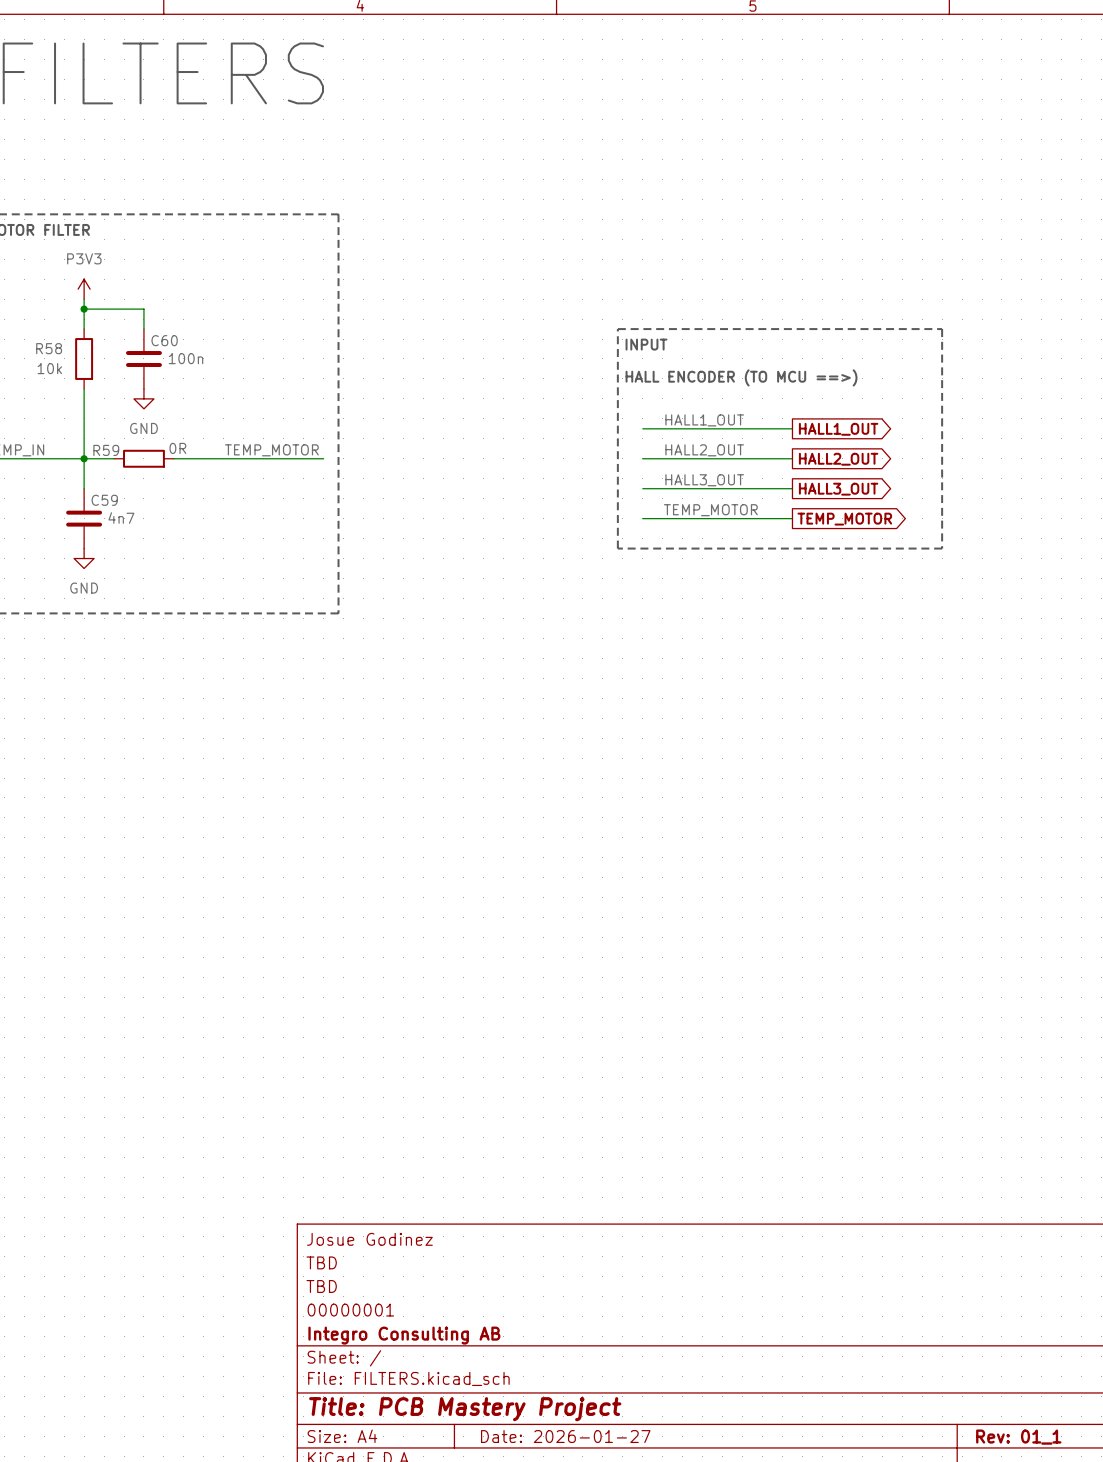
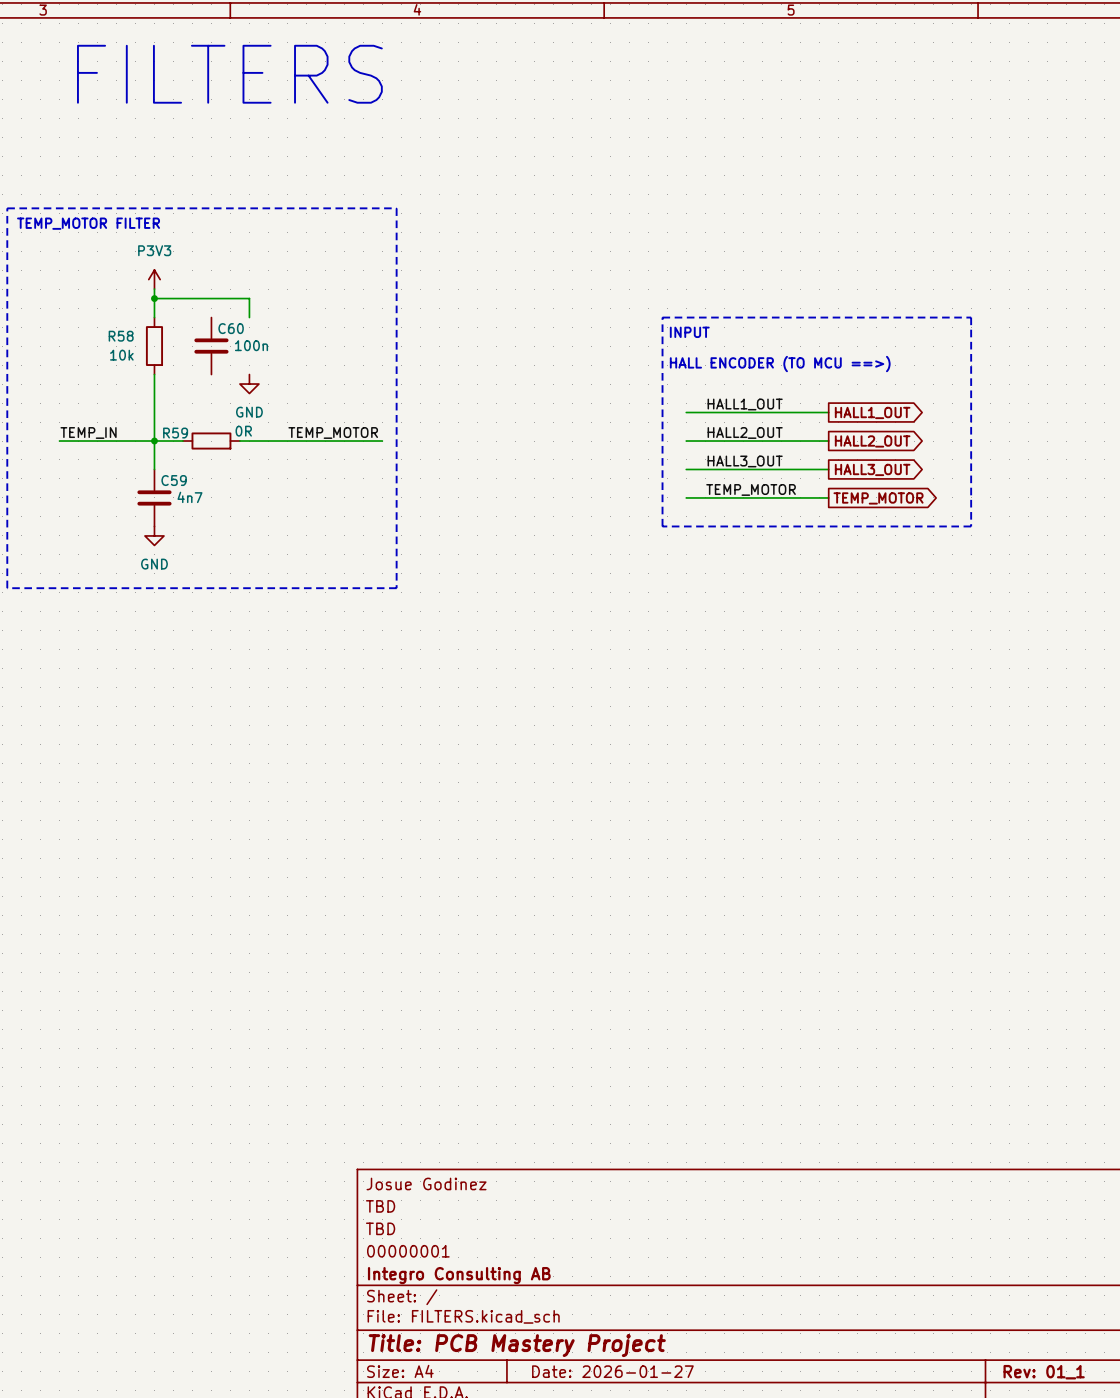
wire: (143, 309) (143, 329) -> (211, 298) (249, 298) (249, 317)
power symbol position: GND (143, 398) -> GND (249, 384)

